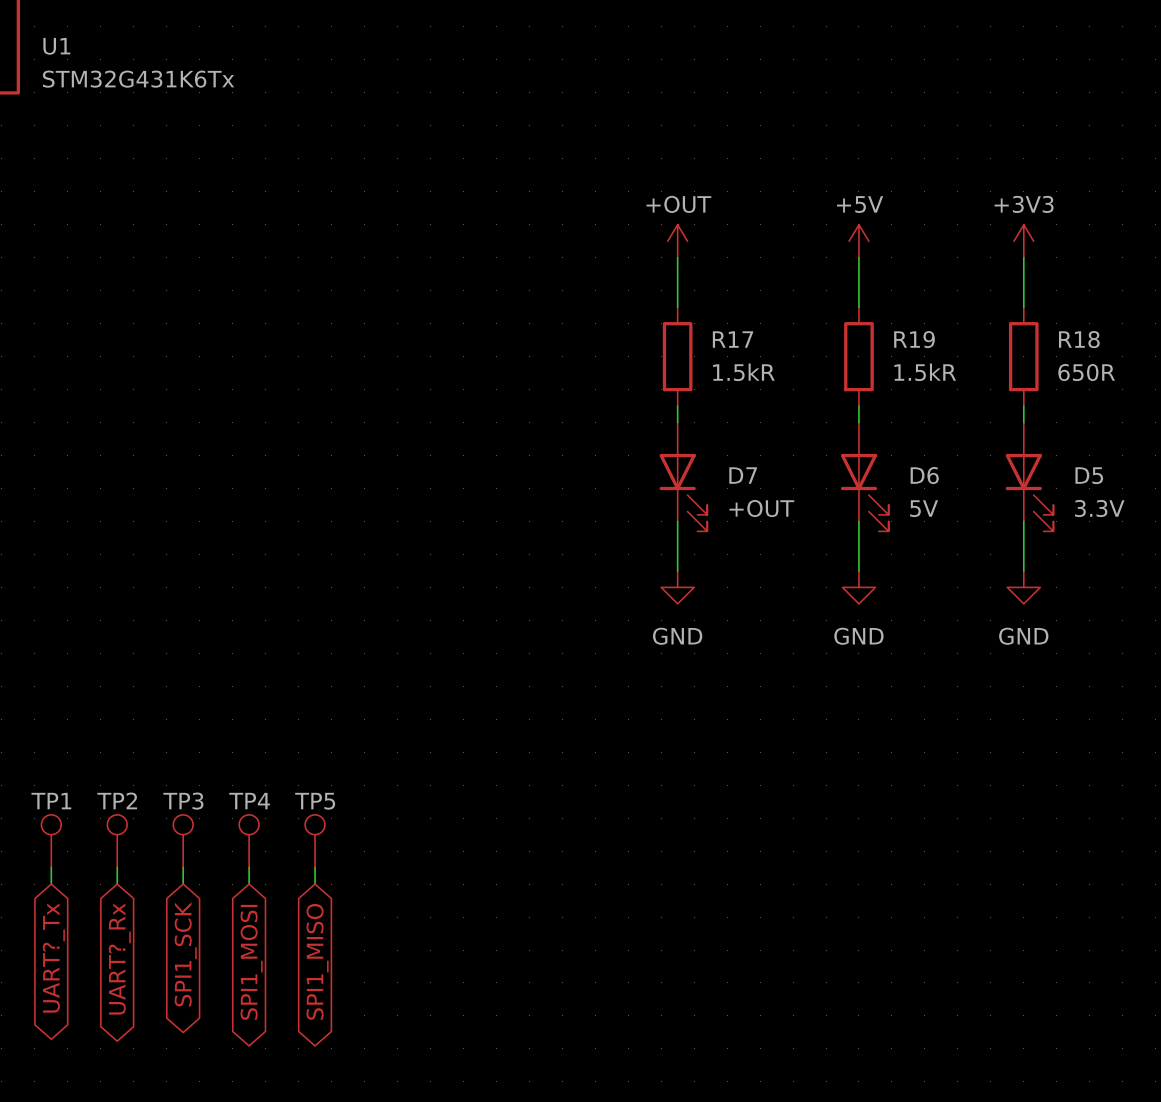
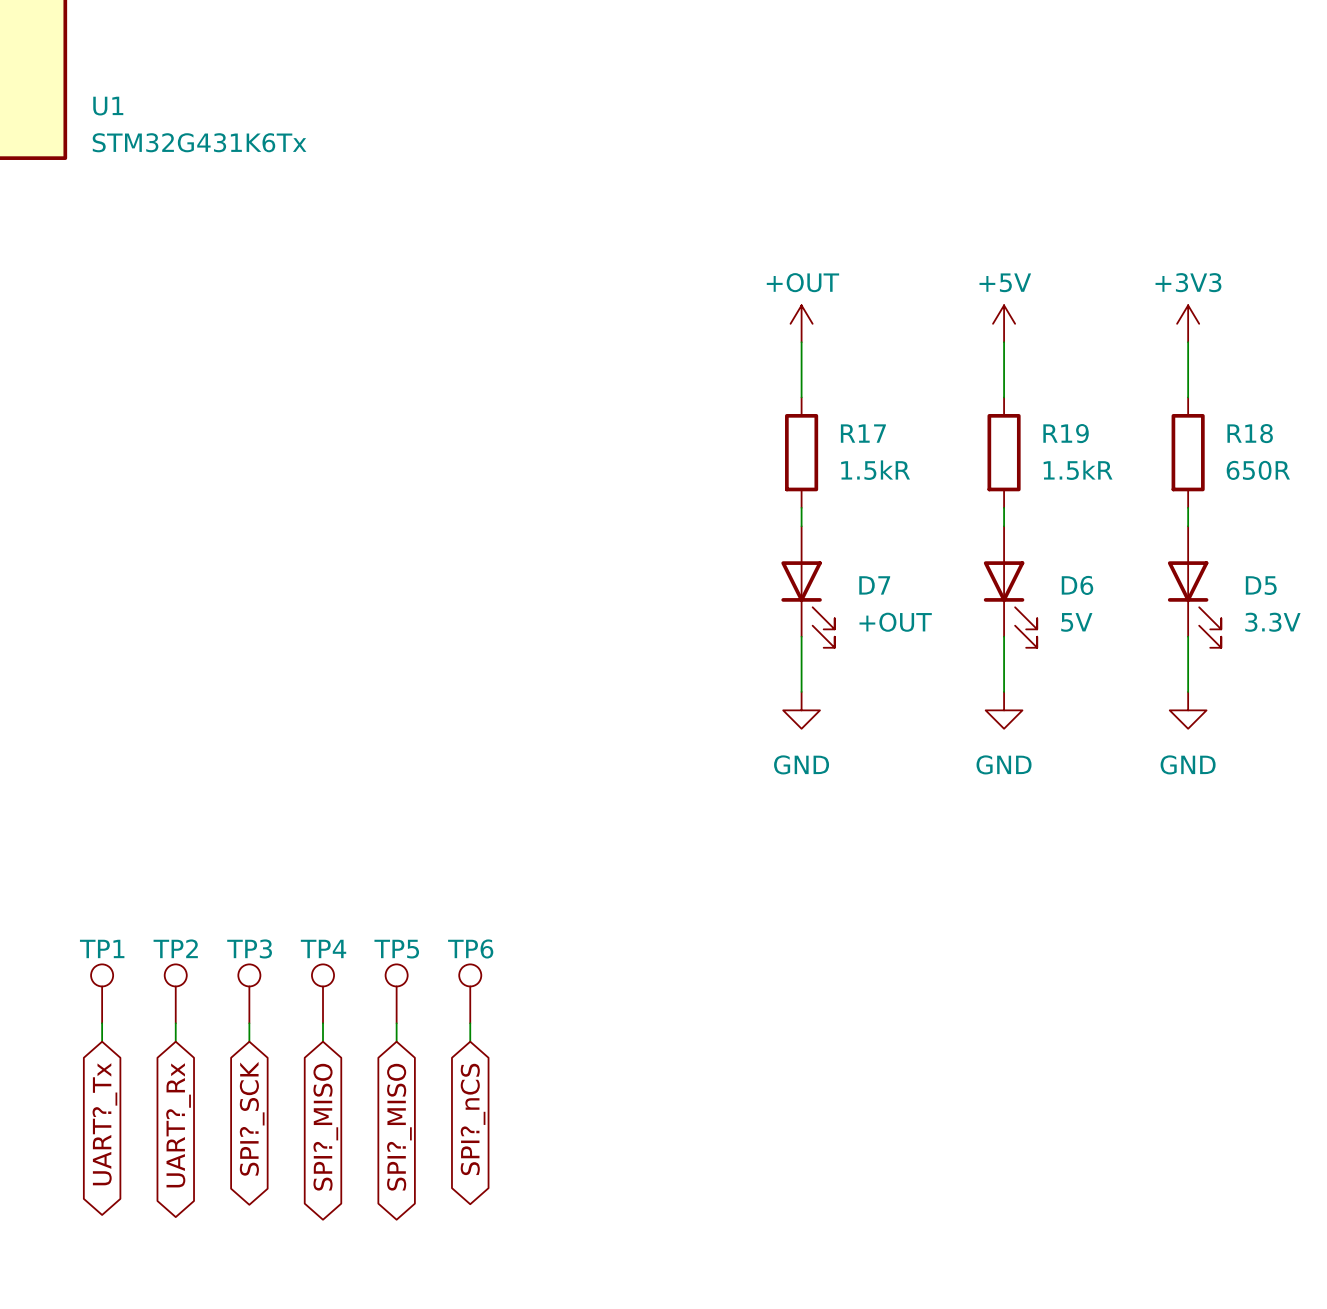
TP6: none -> (470, 993)
wire: none -> (470, 1023) (470, 1041)
global label: none -> SPI?_nCS (473, 1119)
global label: SPI1_SCK (185, 954) -> SPI?_SCK (252, 1118)
global label: SPI1_MISO (317, 961) -> SPI?_MISO (399, 1127)
global label: SPI1_MOSI (251, 962) -> SPI?_MISO (325, 1127)

